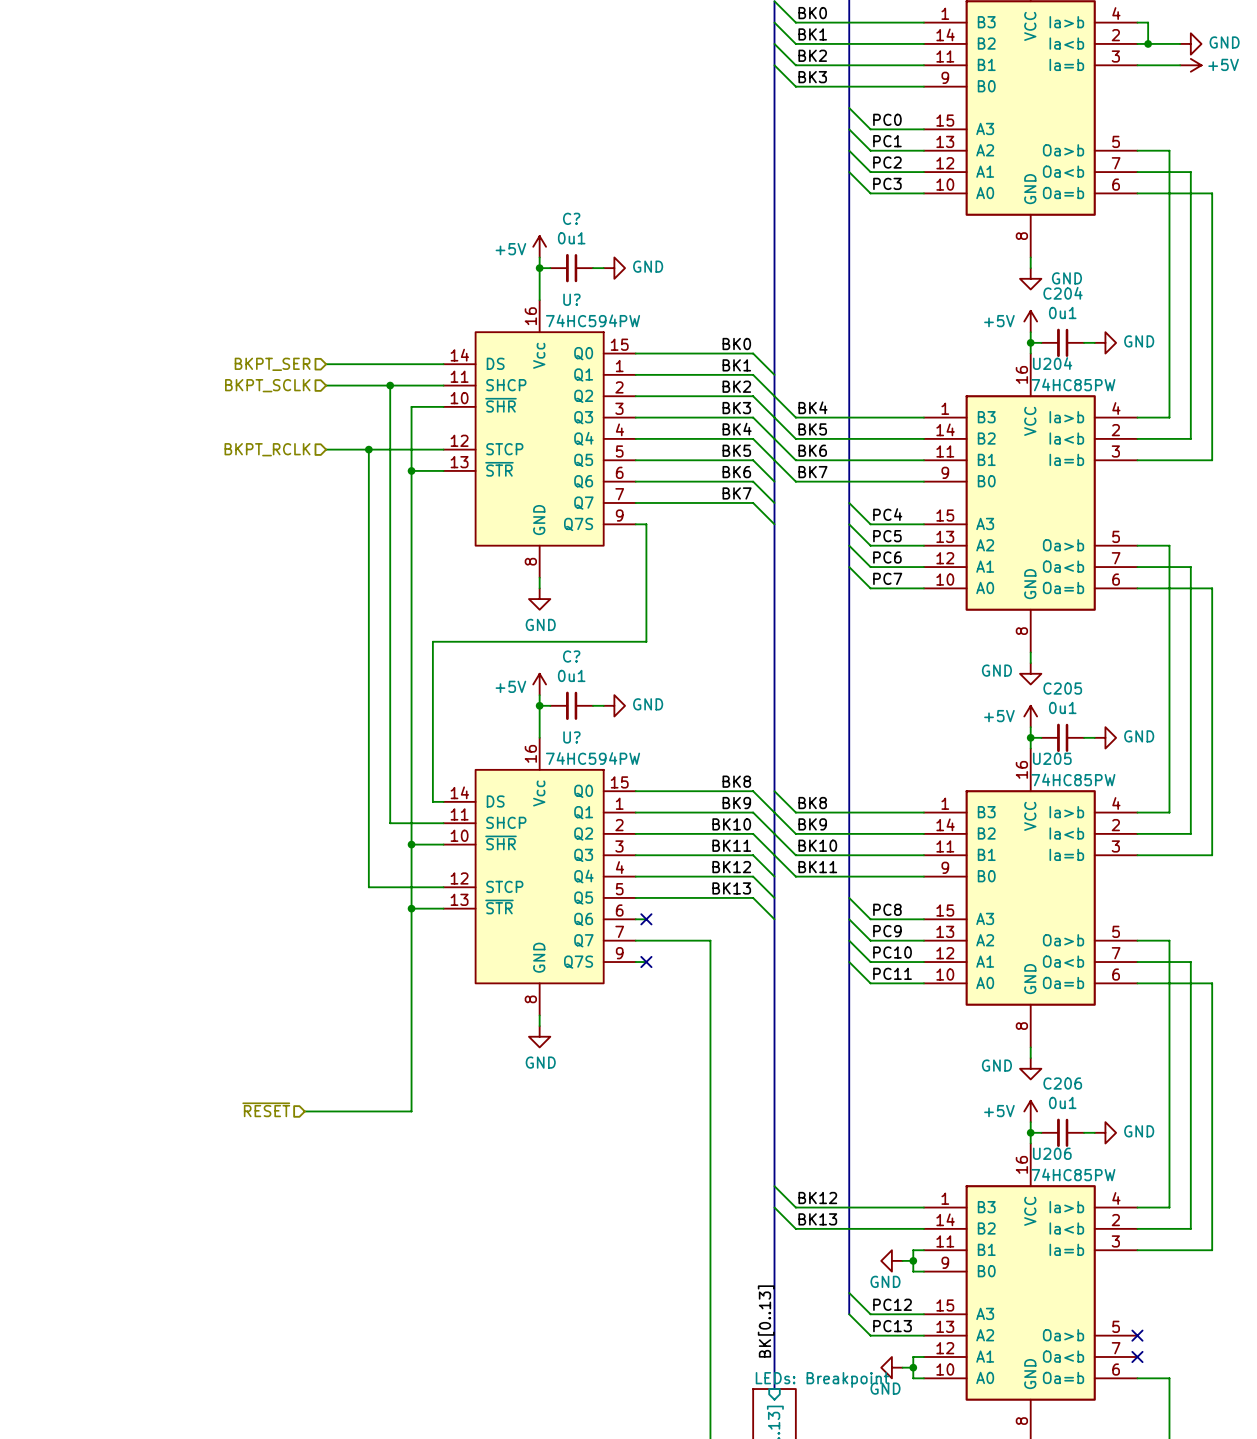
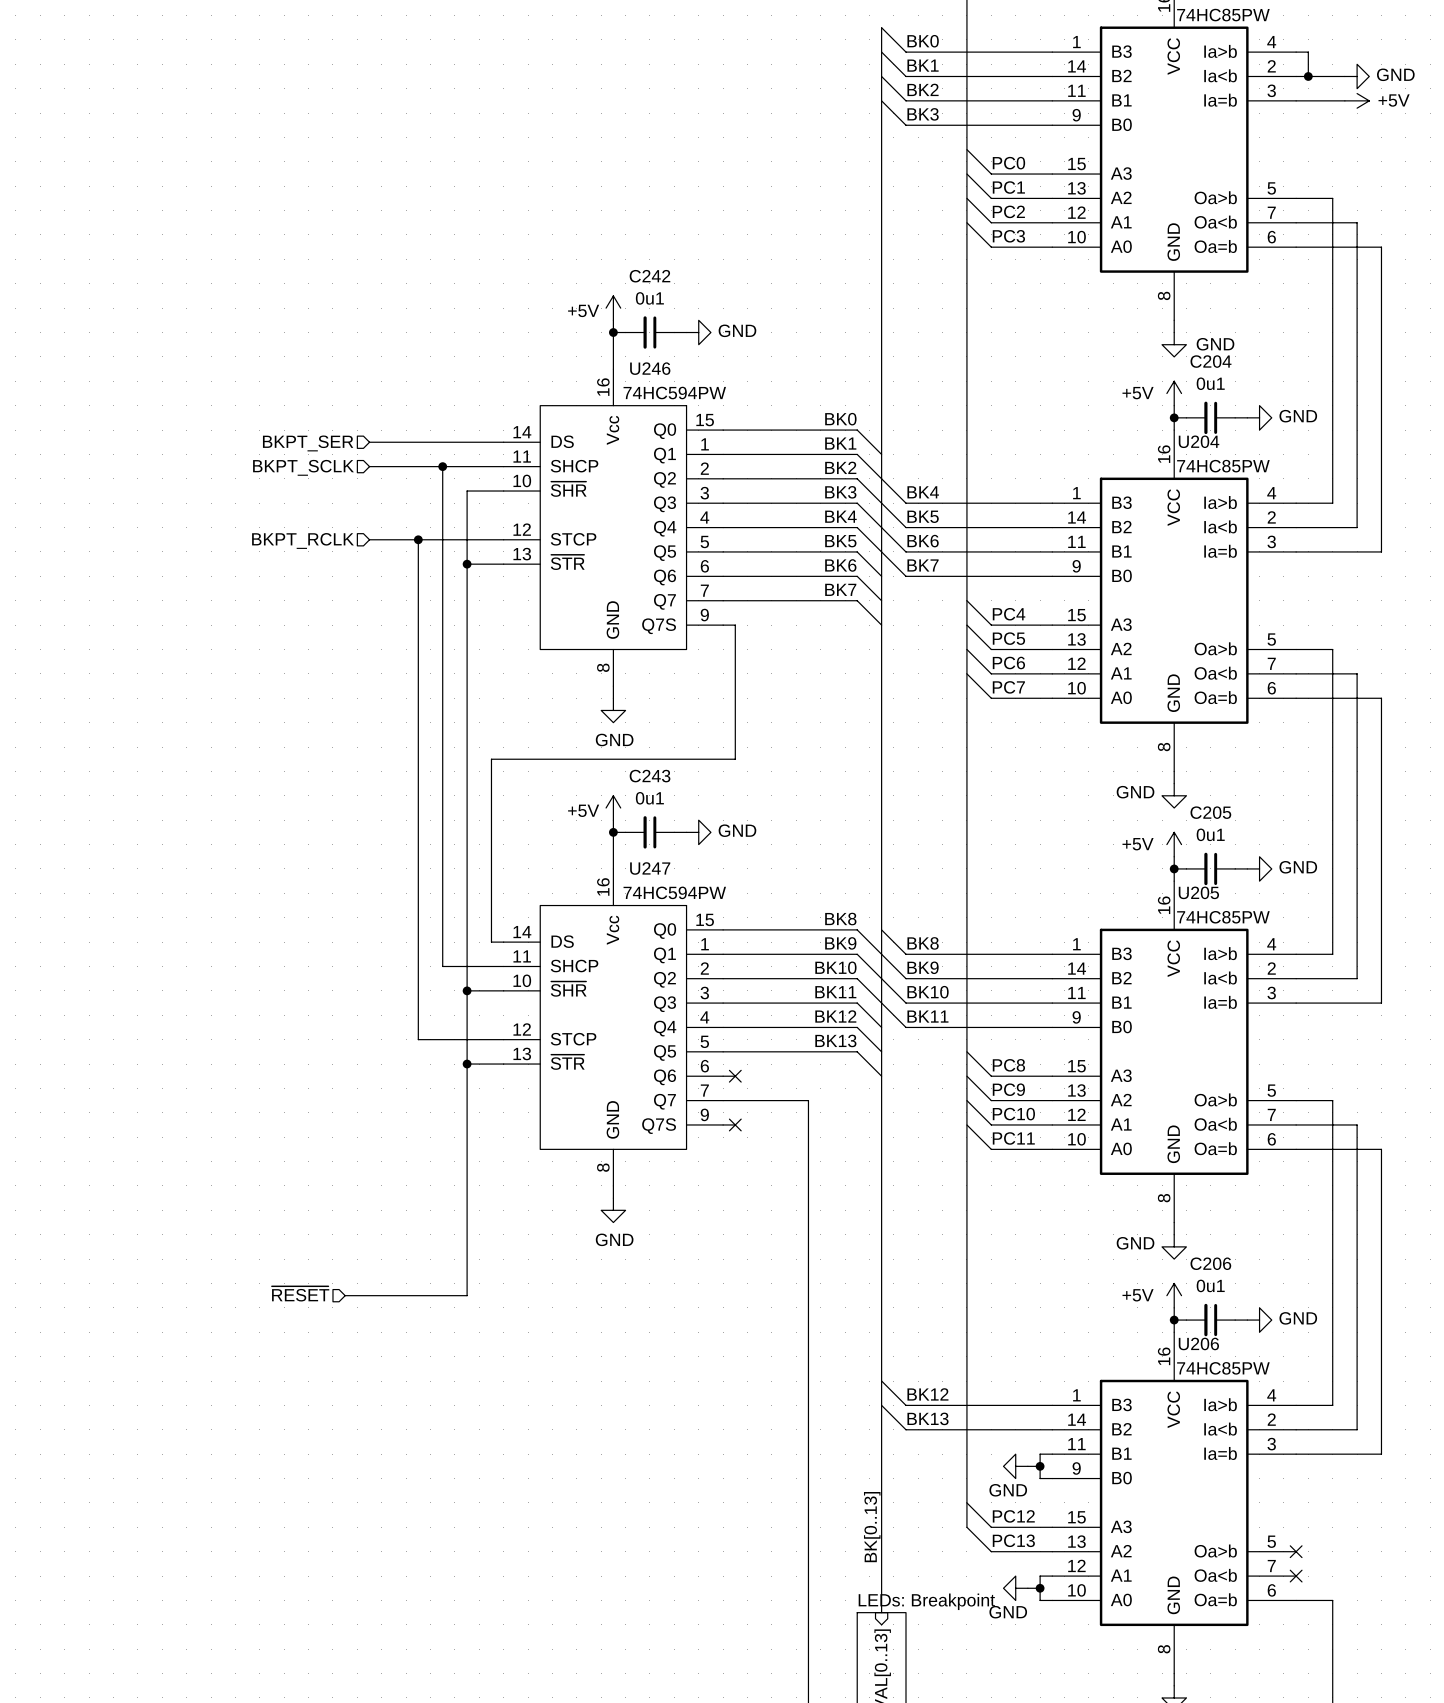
C? name: C? (571, 218) -> C242 (649, 276)
U? name: U? (571, 299) -> U246 (650, 368)
C? name: C? (571, 656) -> C243 (650, 776)
U? name: U? (571, 737) -> U247 (650, 868)

